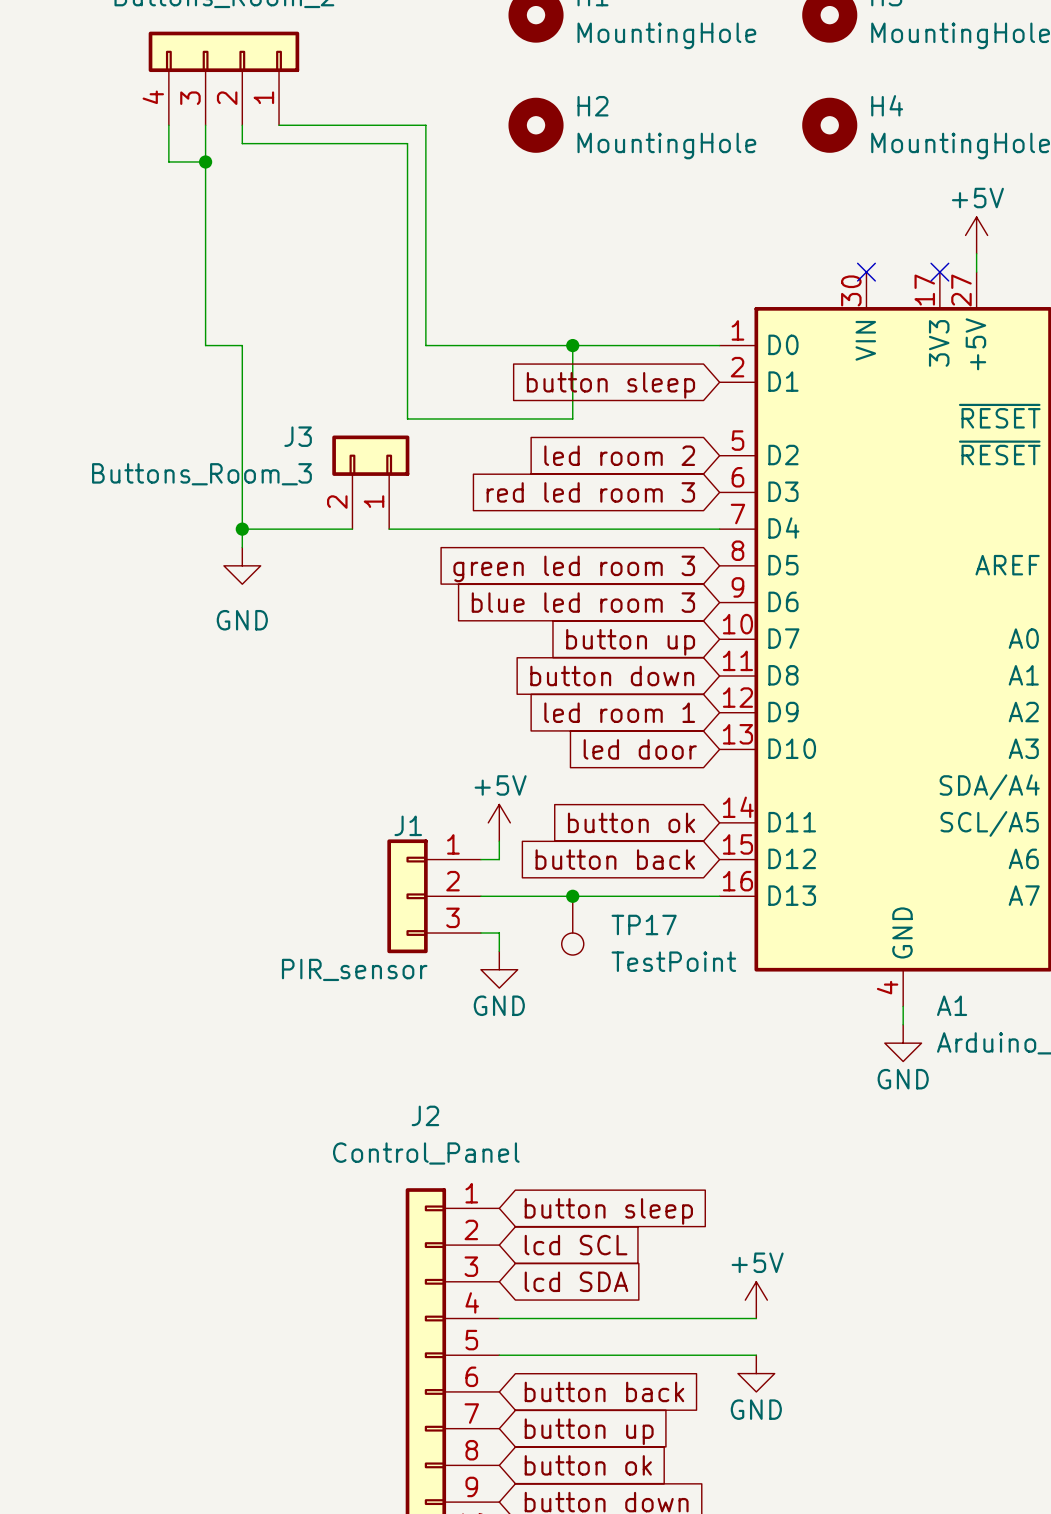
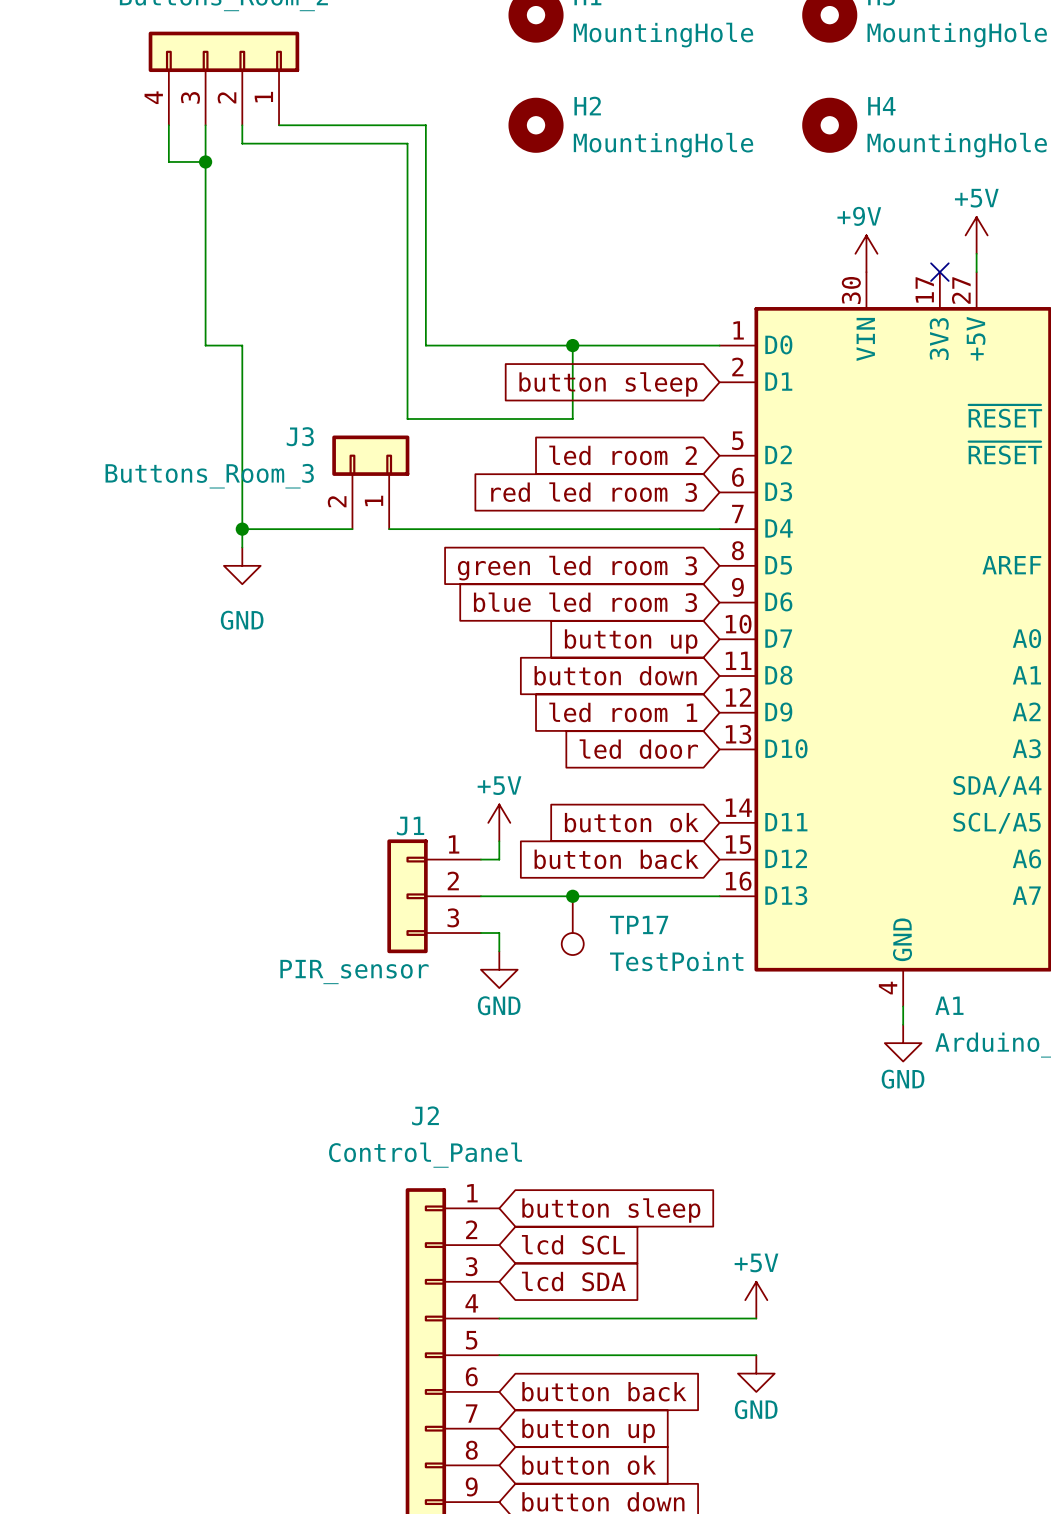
power symbol: none -> +9V (866, 253)
no-connect mark: (866, 272) -> none

